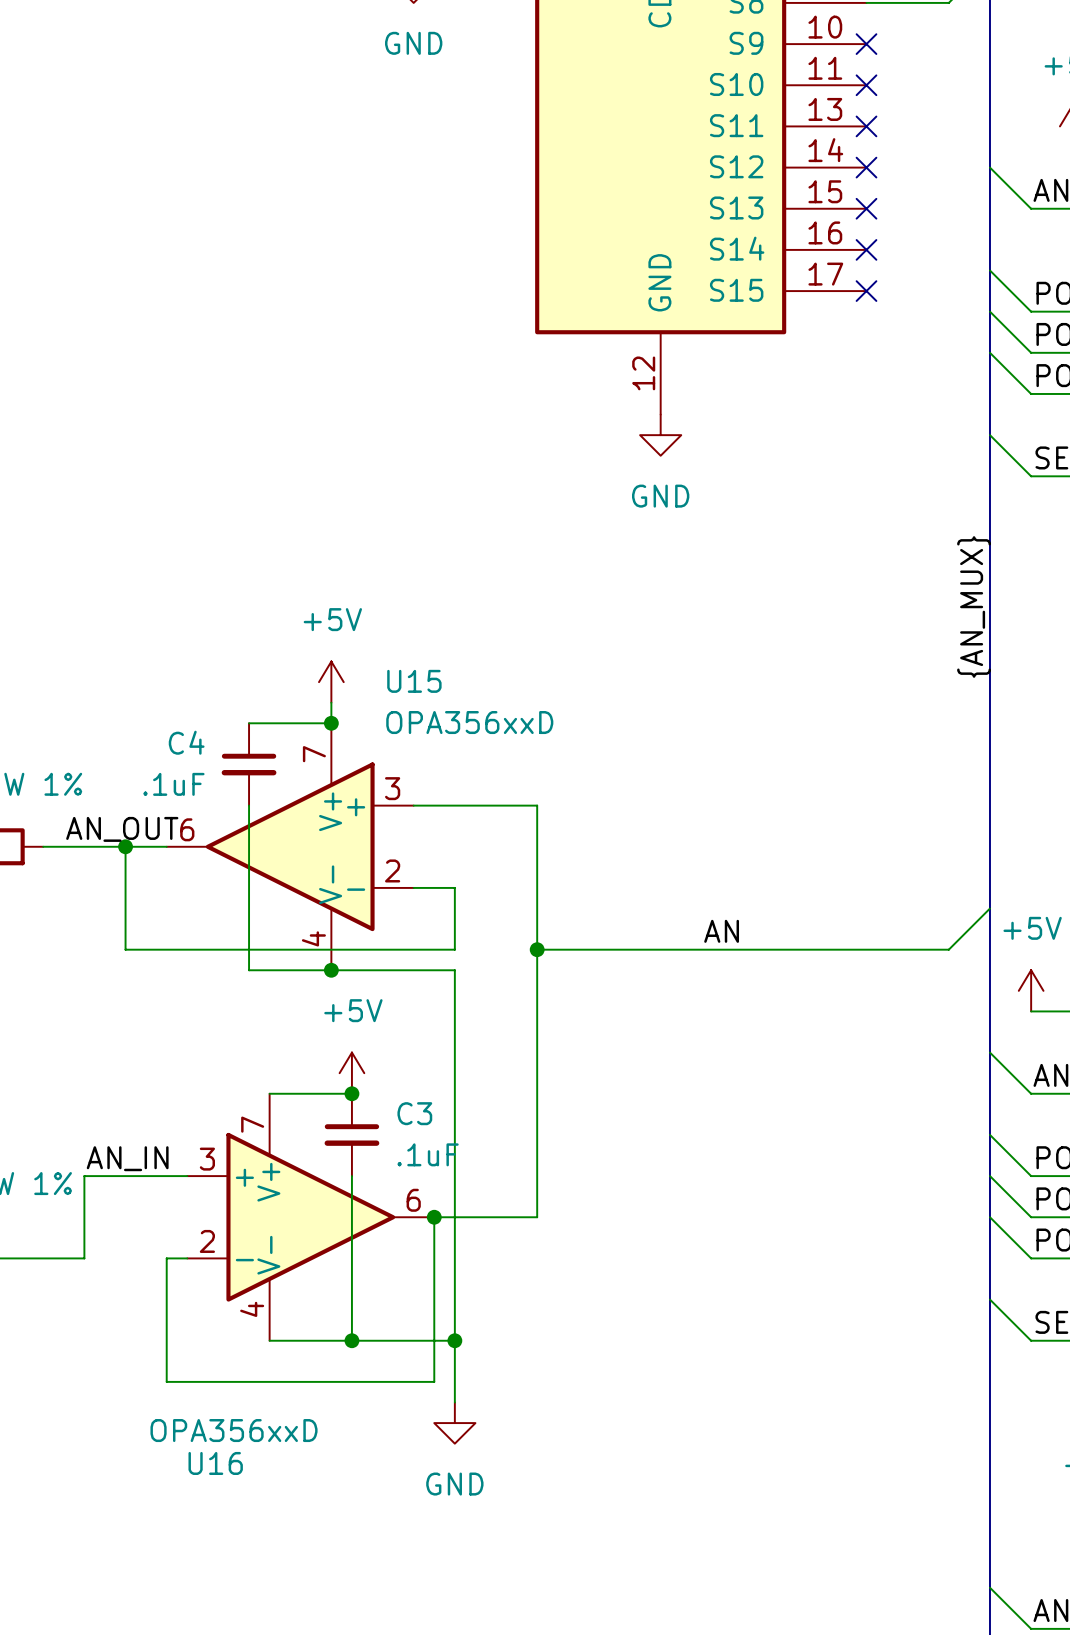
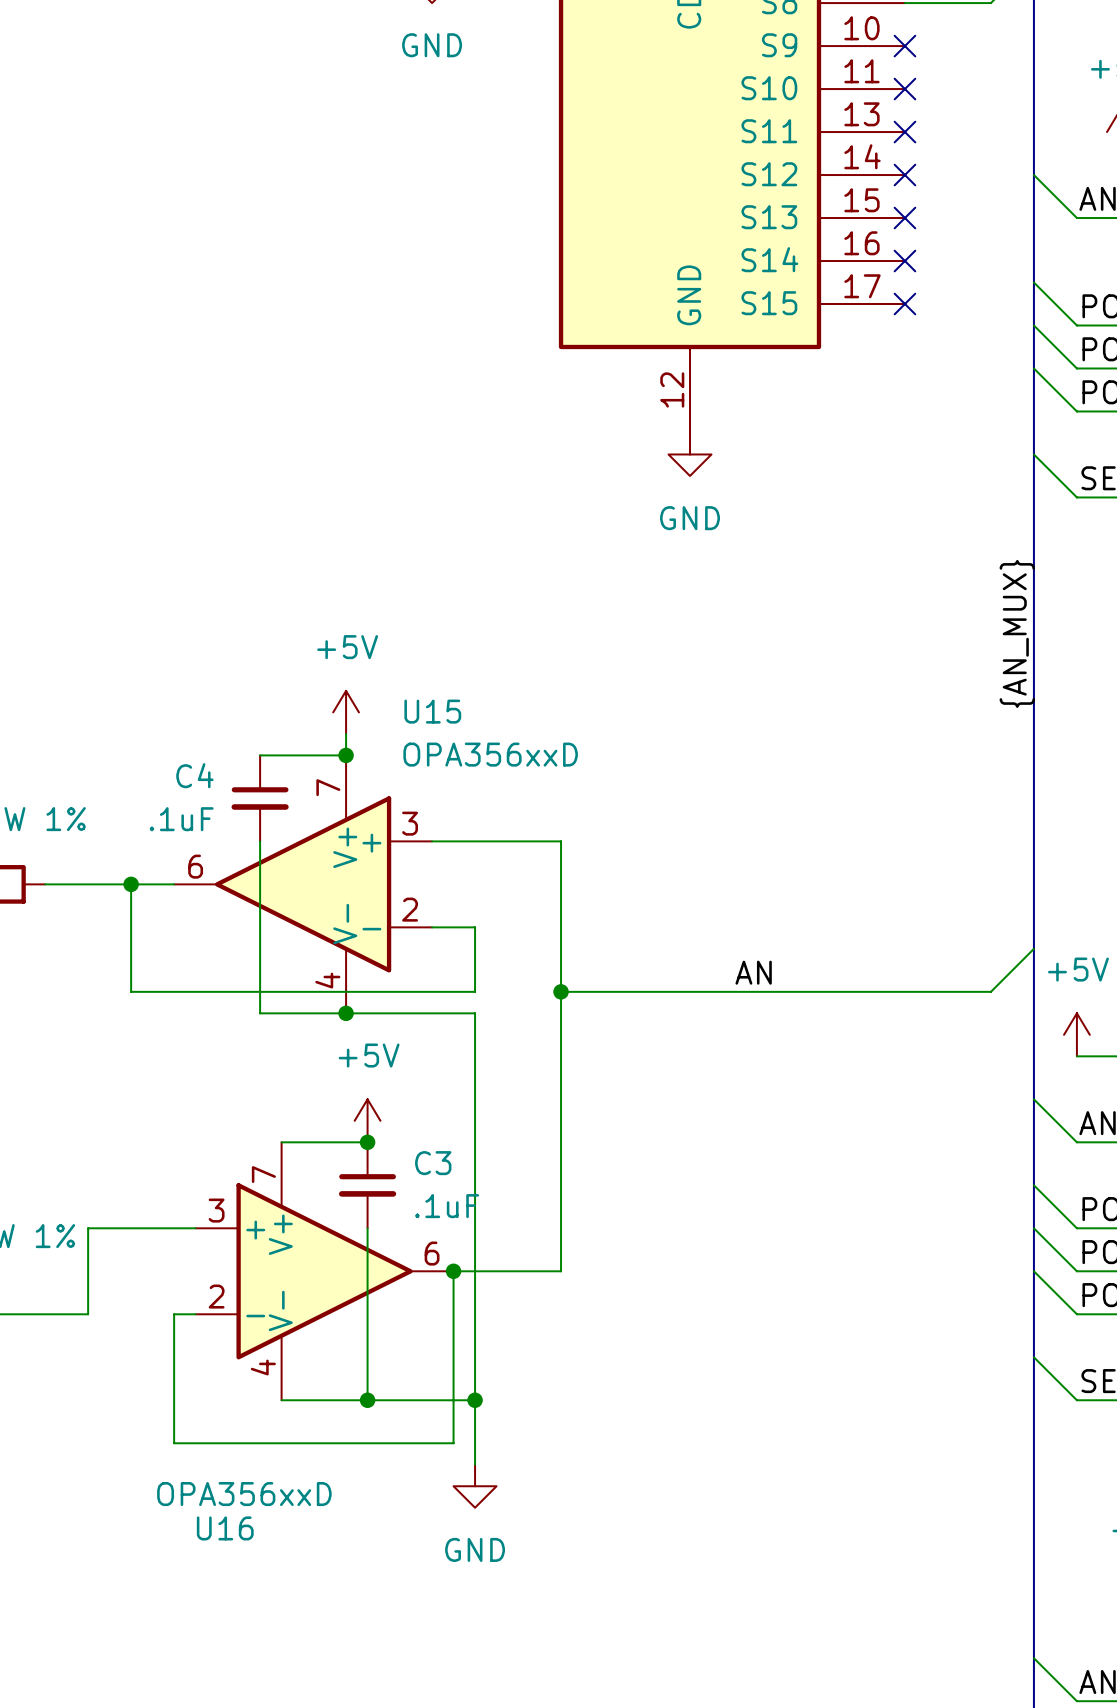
label: AN_OUT (122, 829) -> none
label: AN_IN (127, 1158) -> none

